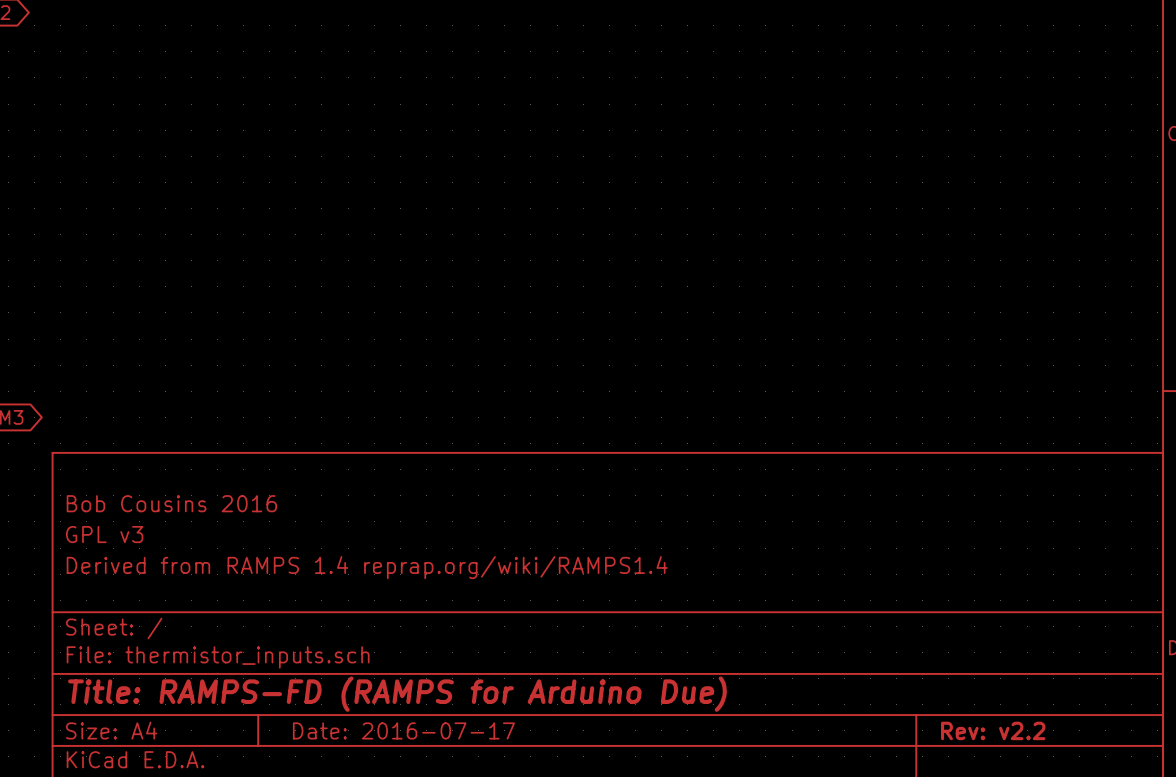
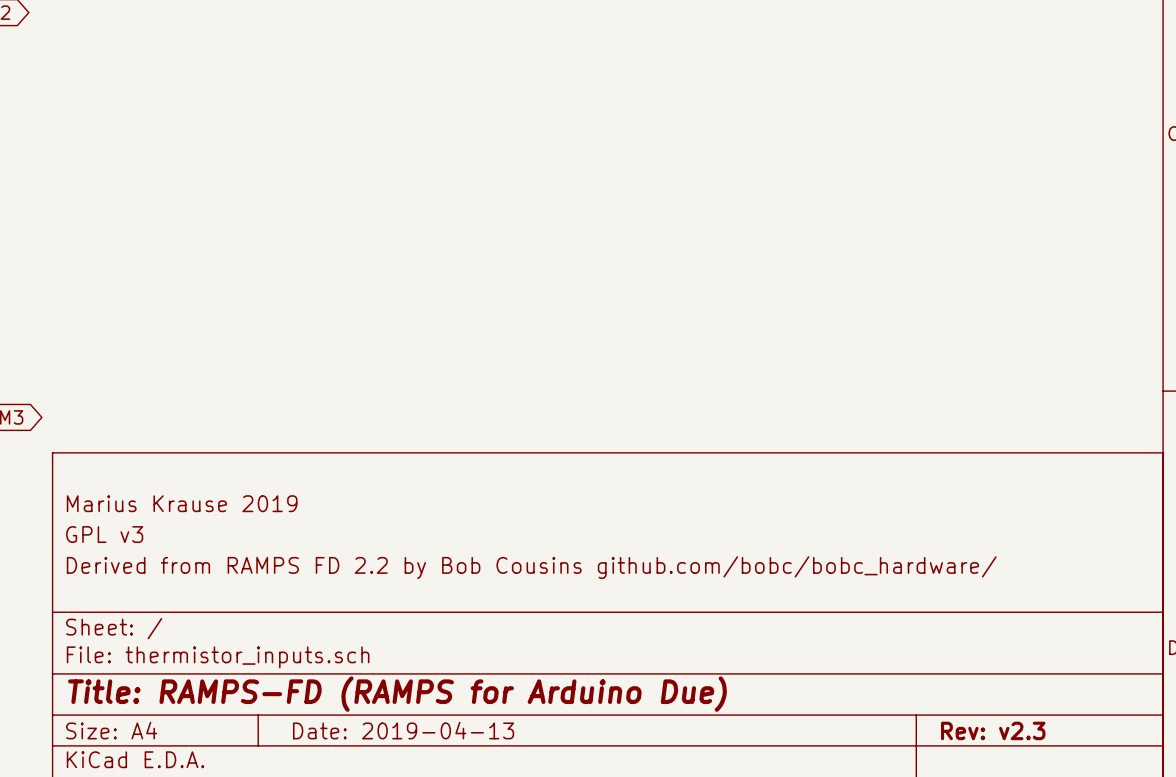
title block: Bob Cousins 2016 (171, 503) -> Marius Krause 2019 (182, 503)
title block: Derived from RAMPS 1.4 reprap.org/wiki/RAMPS1.4 (367, 567) -> Derived from RAMPS FD 2.2 by Bob Cousins github.com/bobc/bobc_hardware/ (531, 567)
title block: Date: 2016-07-17 (403, 730) -> Date: 2019-04-13 (403, 730)
title block: Rev: v2.2 (993, 730) -> Rev: v2.3 (993, 730)

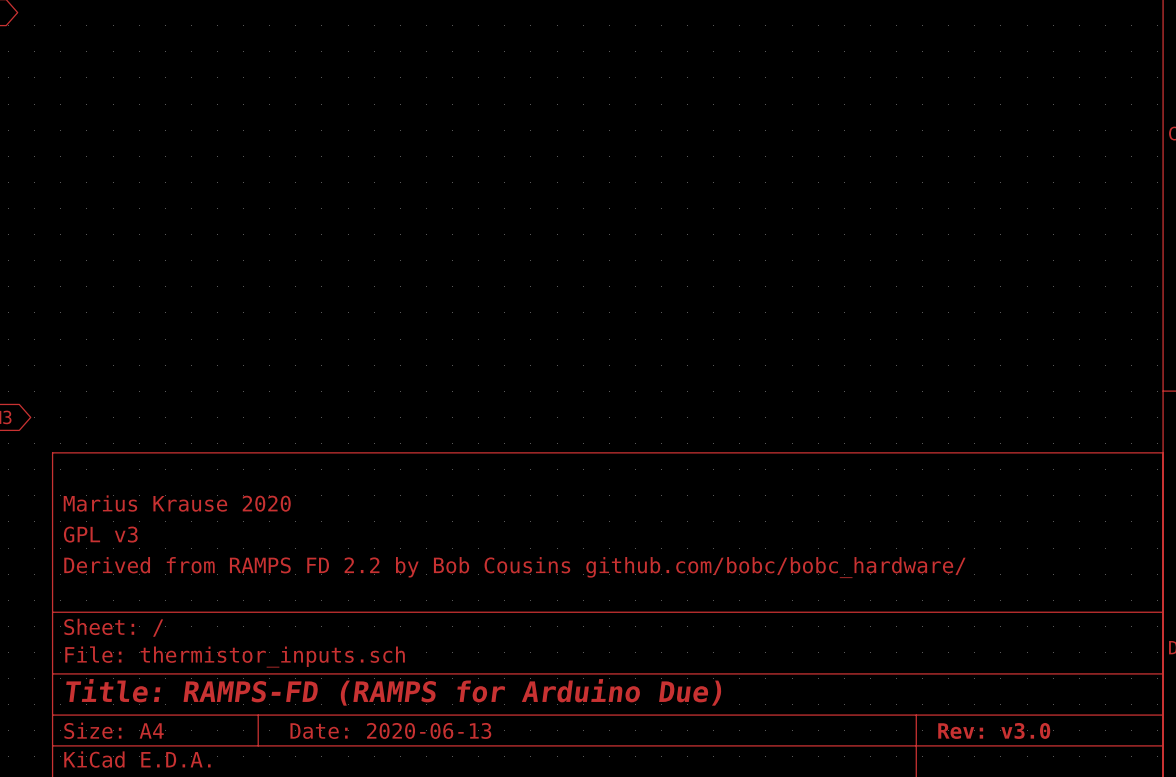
title block: Marius Krause 2019 (182, 503) -> Marius Krause 2020 (177, 503)
title block: Date: 2019-04-13 (403, 730) -> Date: 2020-06-13 (390, 730)
title block: Rev: v2.3 (993, 730) -> Rev: v3.0 (994, 730)

